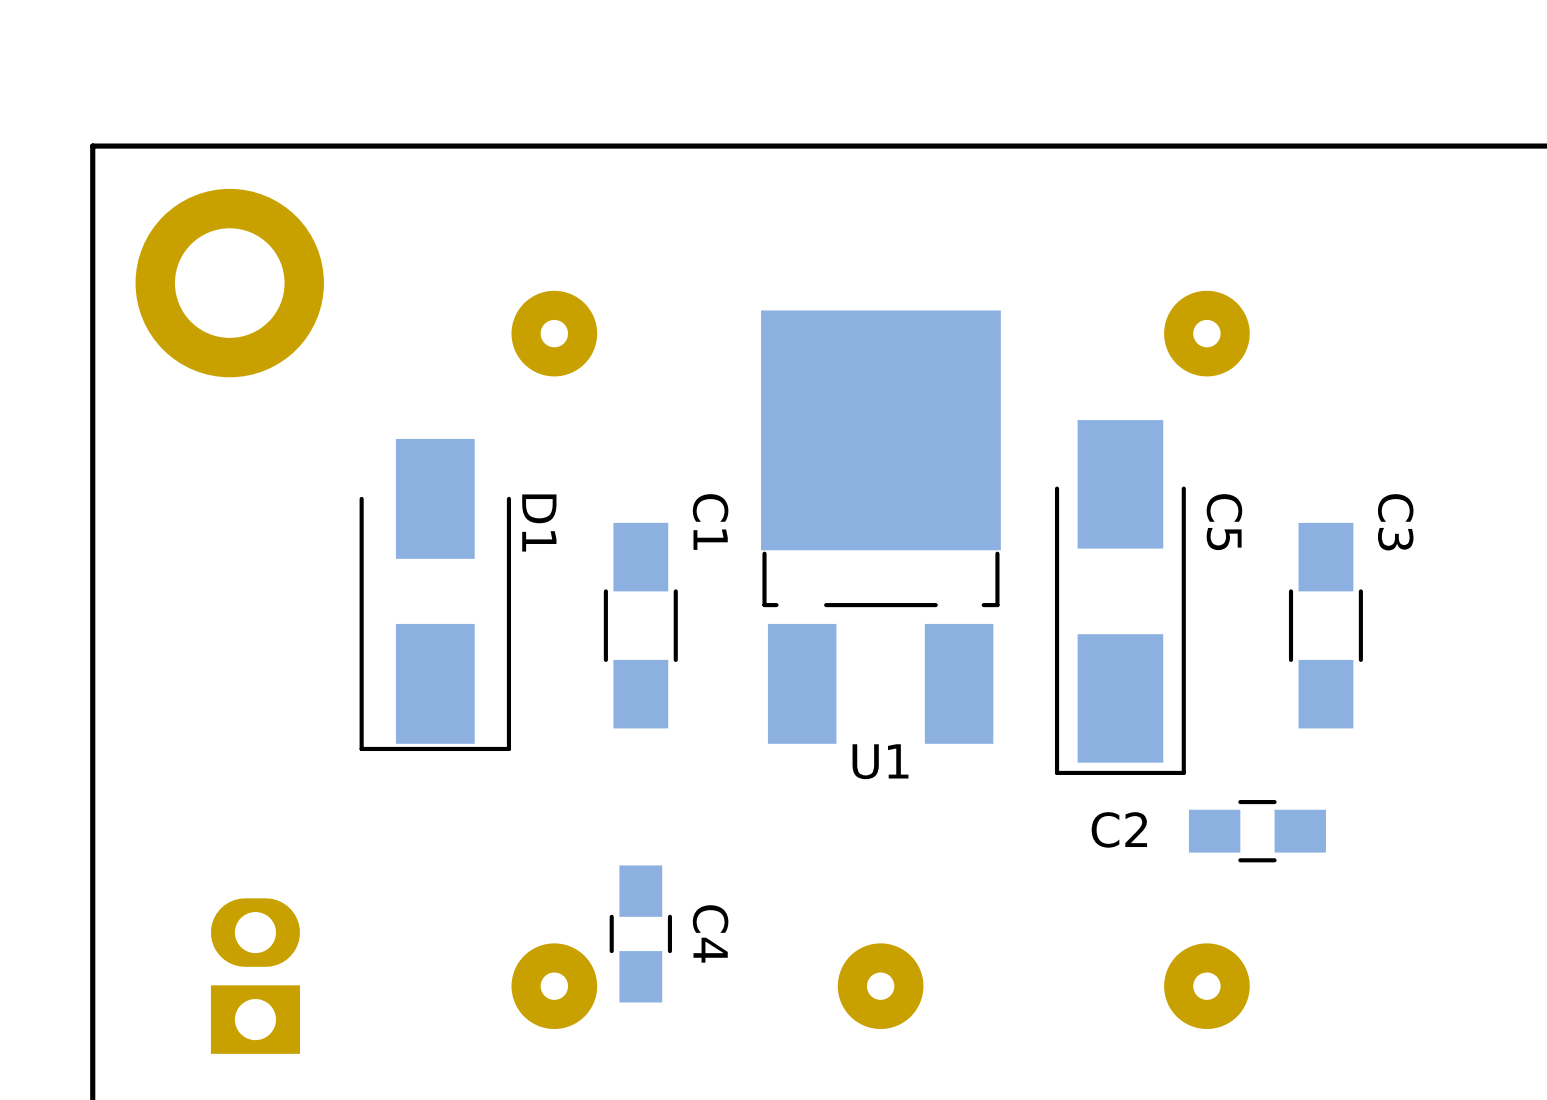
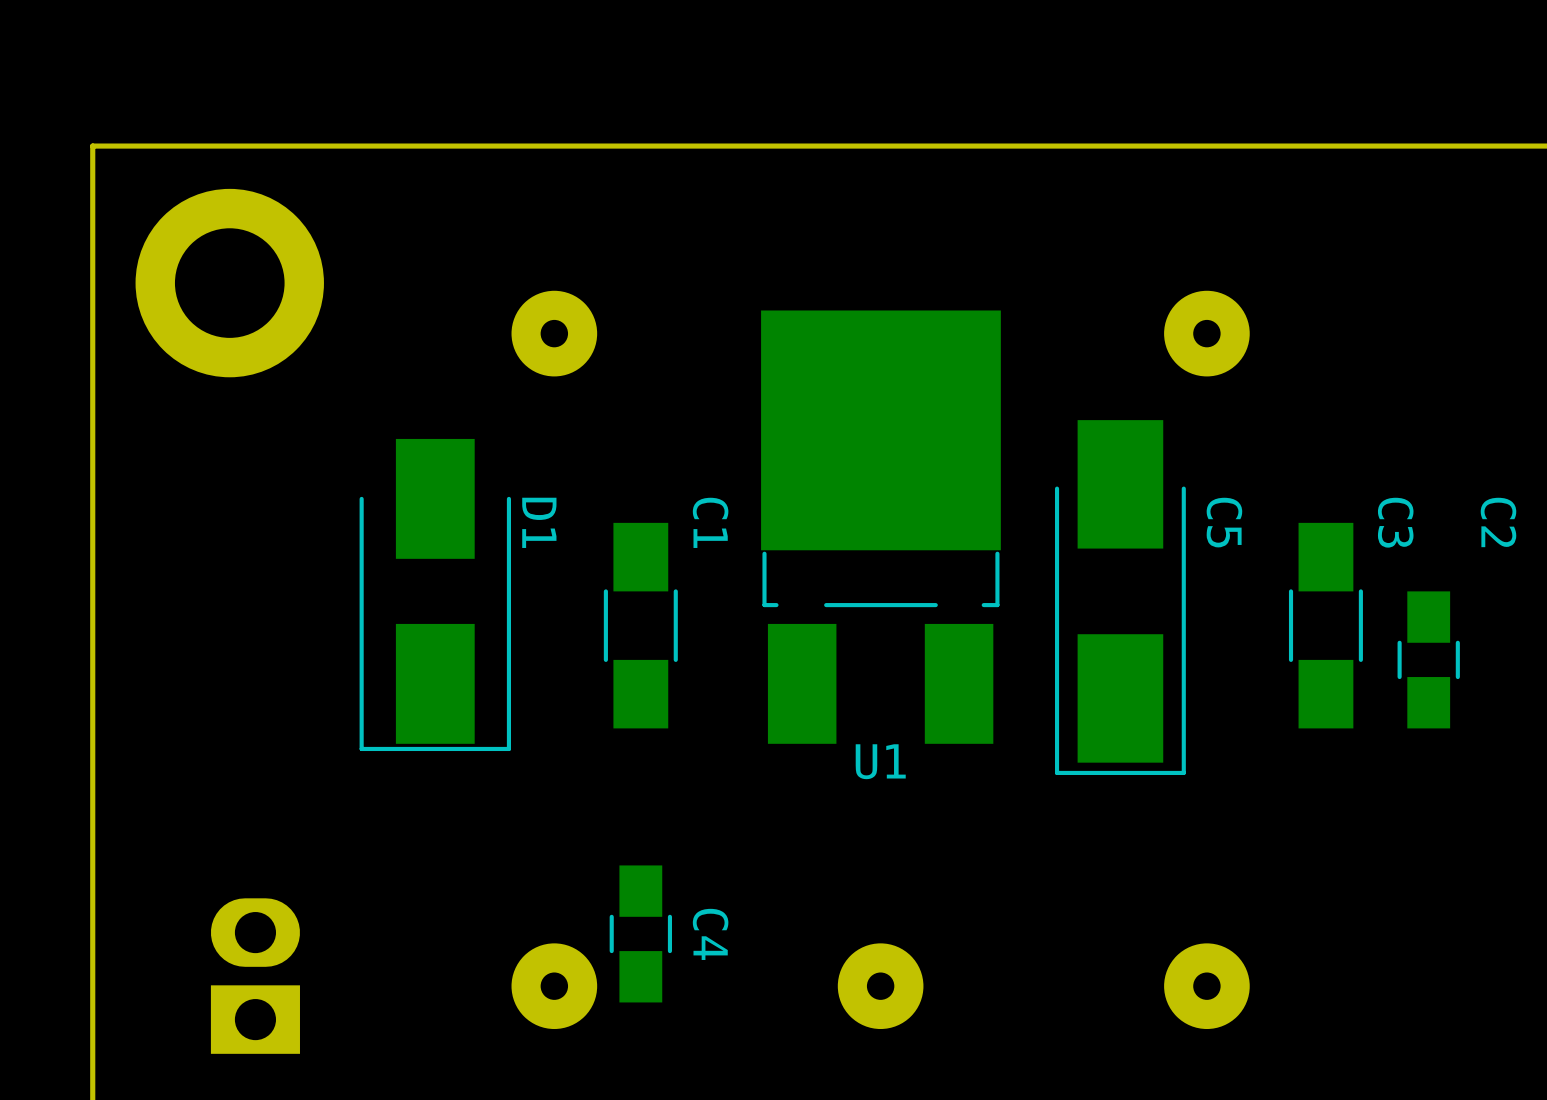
C2 name position: C2 (1119, 829) -> C2 (1498, 522)
C2 rotation: 0° (1257, 831) -> 90° clockwise (1428, 659)
C2 position: (1257, 831) -> (1428, 659)

